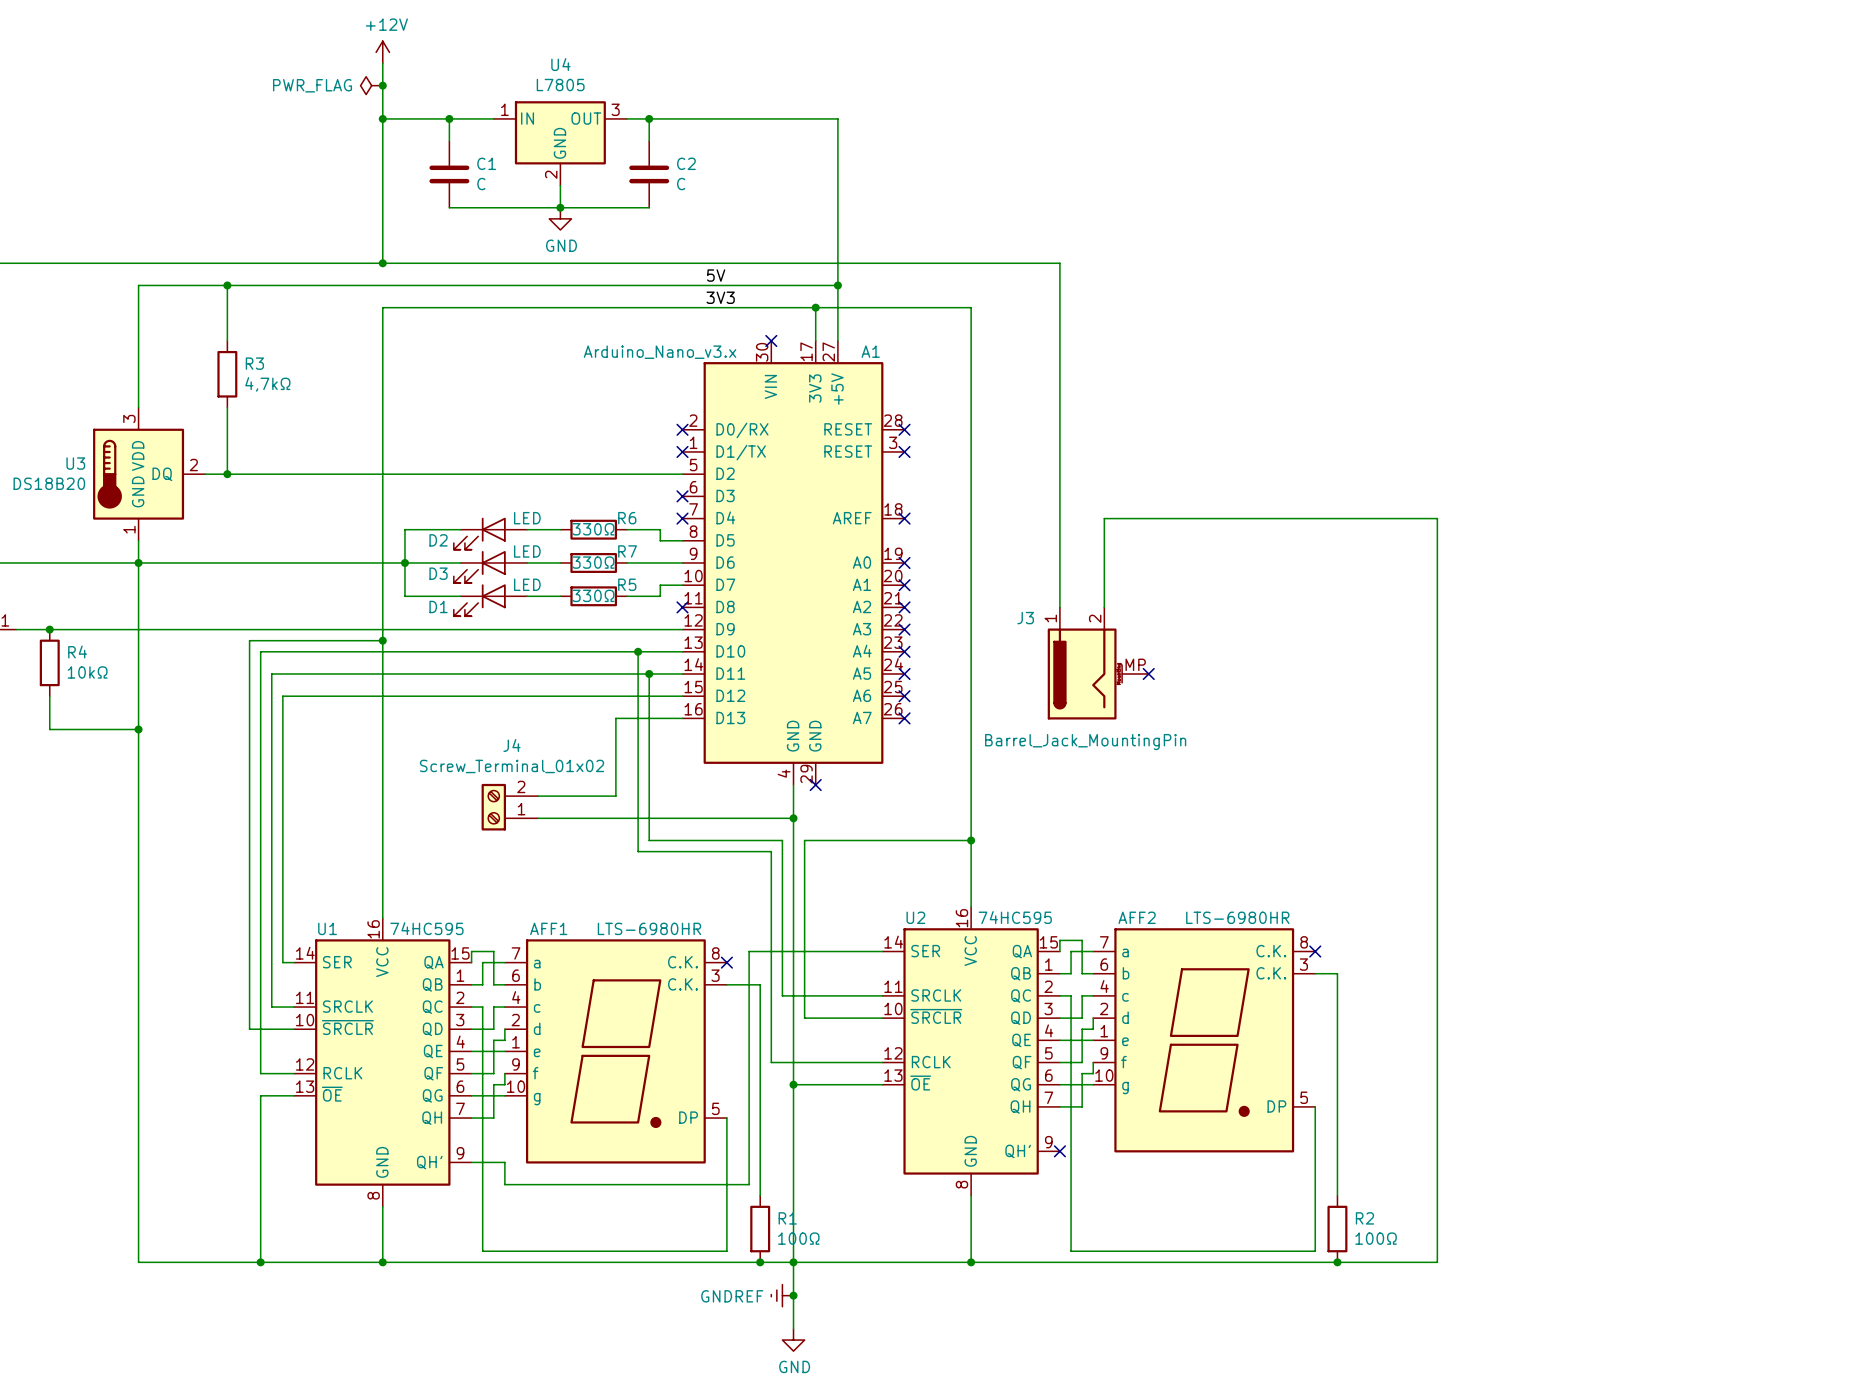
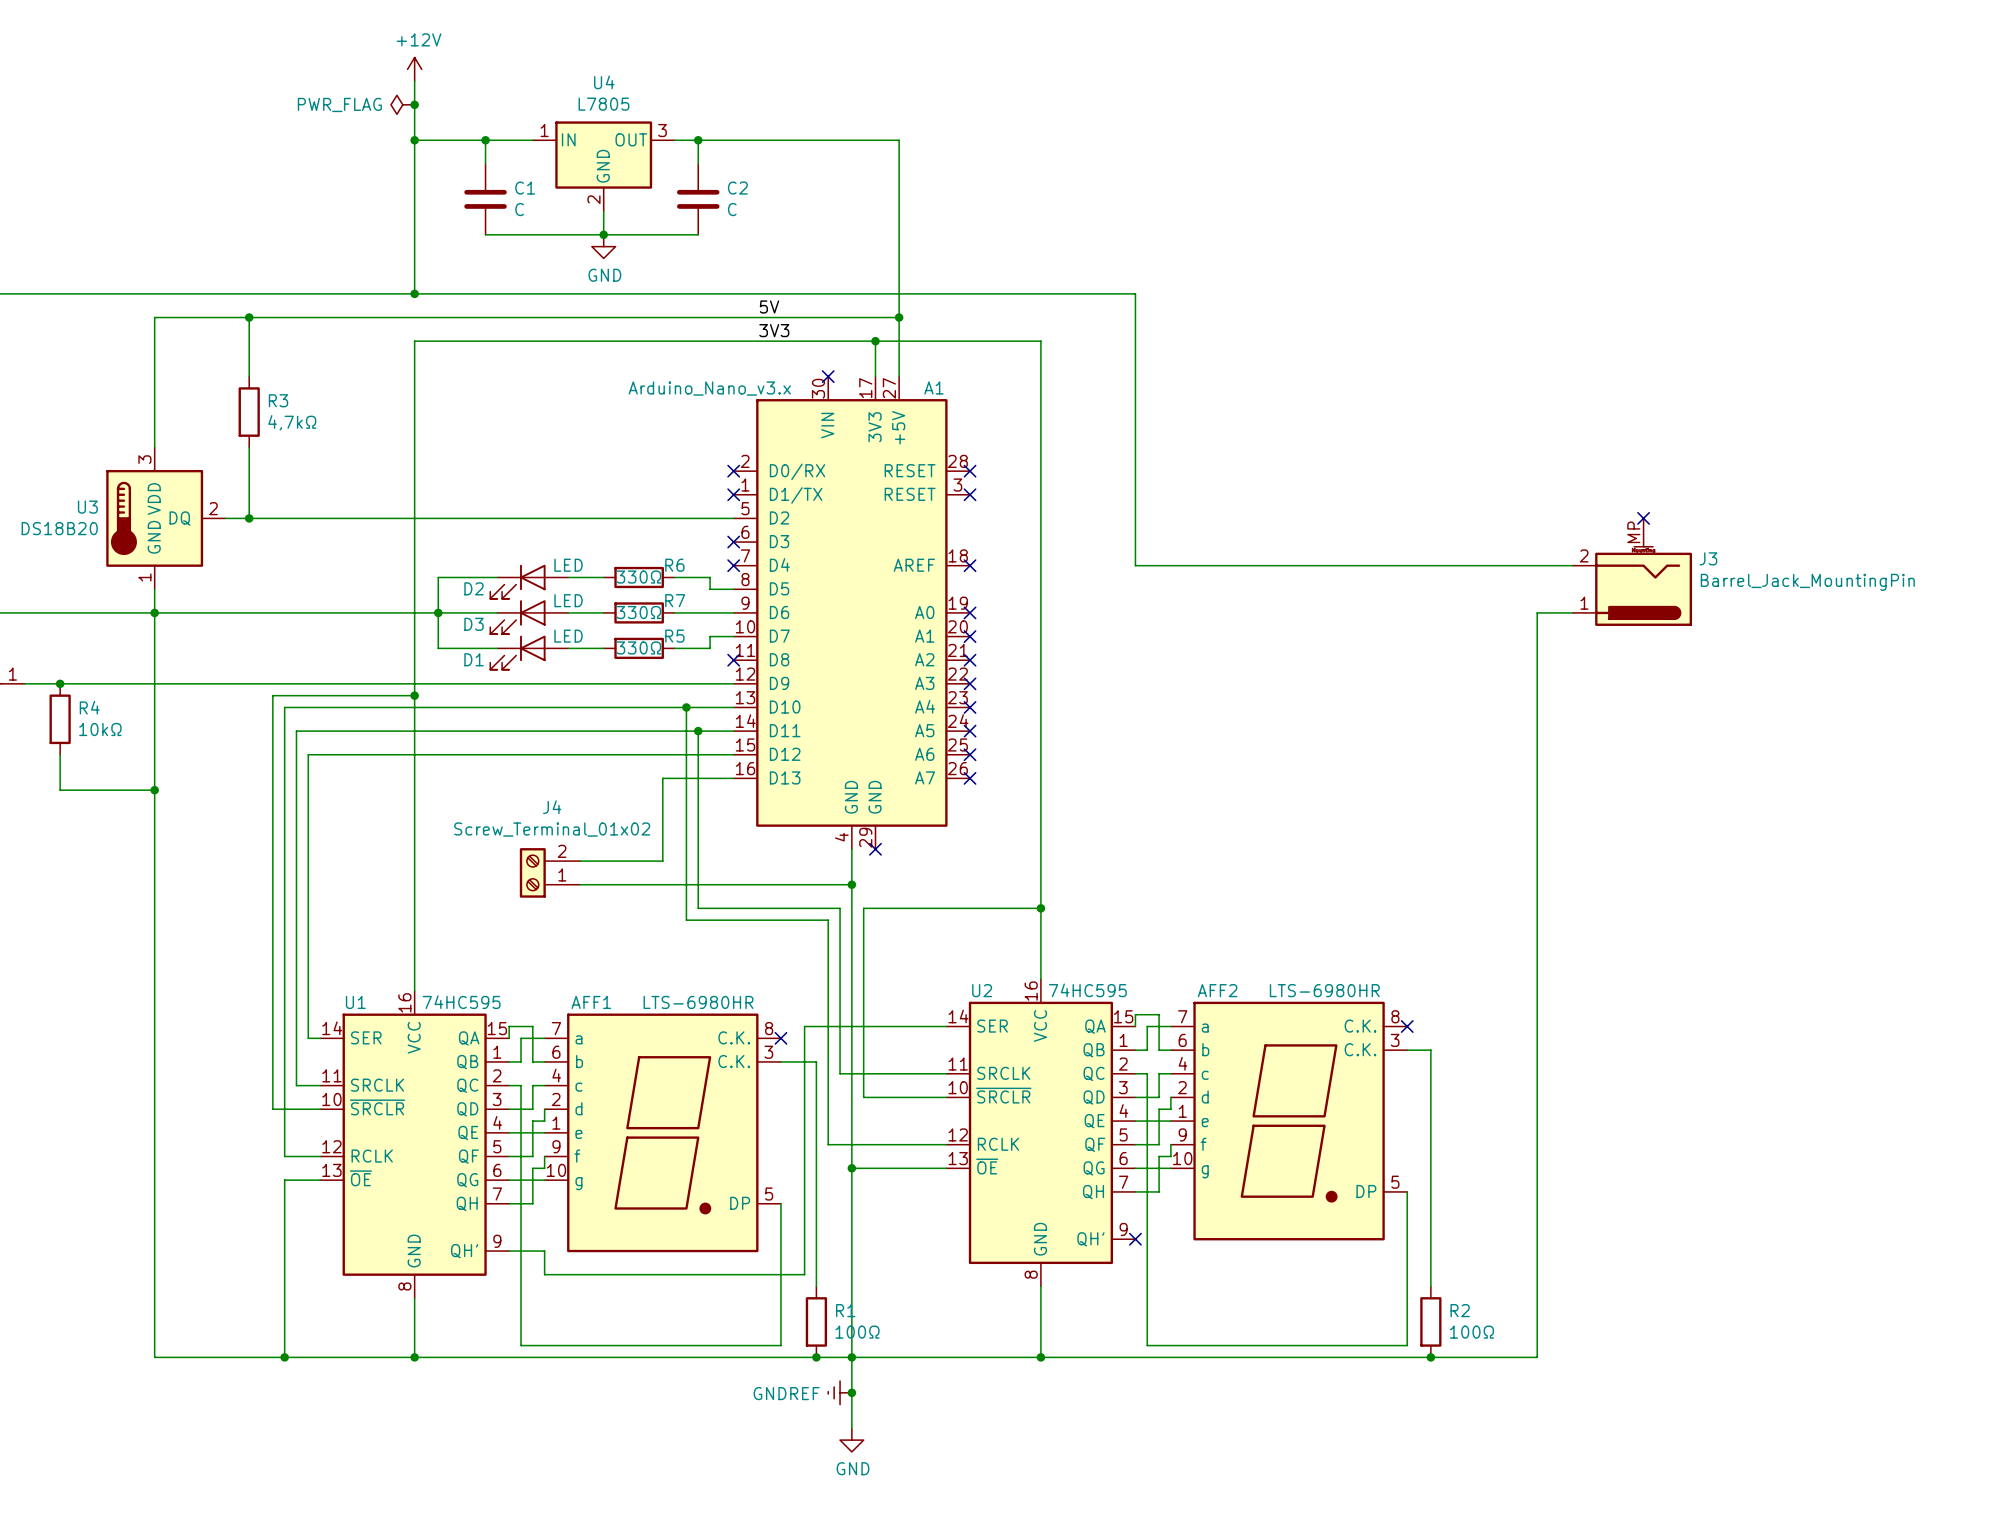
no-connect mark: none -> (1643, 518)
wire: (1059, 518) (1059, 607) -> (1135, 565) (1182, 565)
wire: (1104, 518) (1104, 607) -> none
wire: (1437, 518) (1437, 562) -> (1537, 565) (1572, 565)
wire: none -> (1537, 612) (1572, 612)
J3 name position: J3 (1025, 618) -> J3 (1708, 558)
J3 position: (1098, 663) -> (1632, 572)
J3 rotation: 0° (1085, 673) -> 90° counterclockwise (1643, 586)
no-connect mark: (1148, 673) -> none
J3 value position: Barrel_Jack_MountingPin (1085, 742) -> Barrel_Jack_MountingPin (1807, 582)

